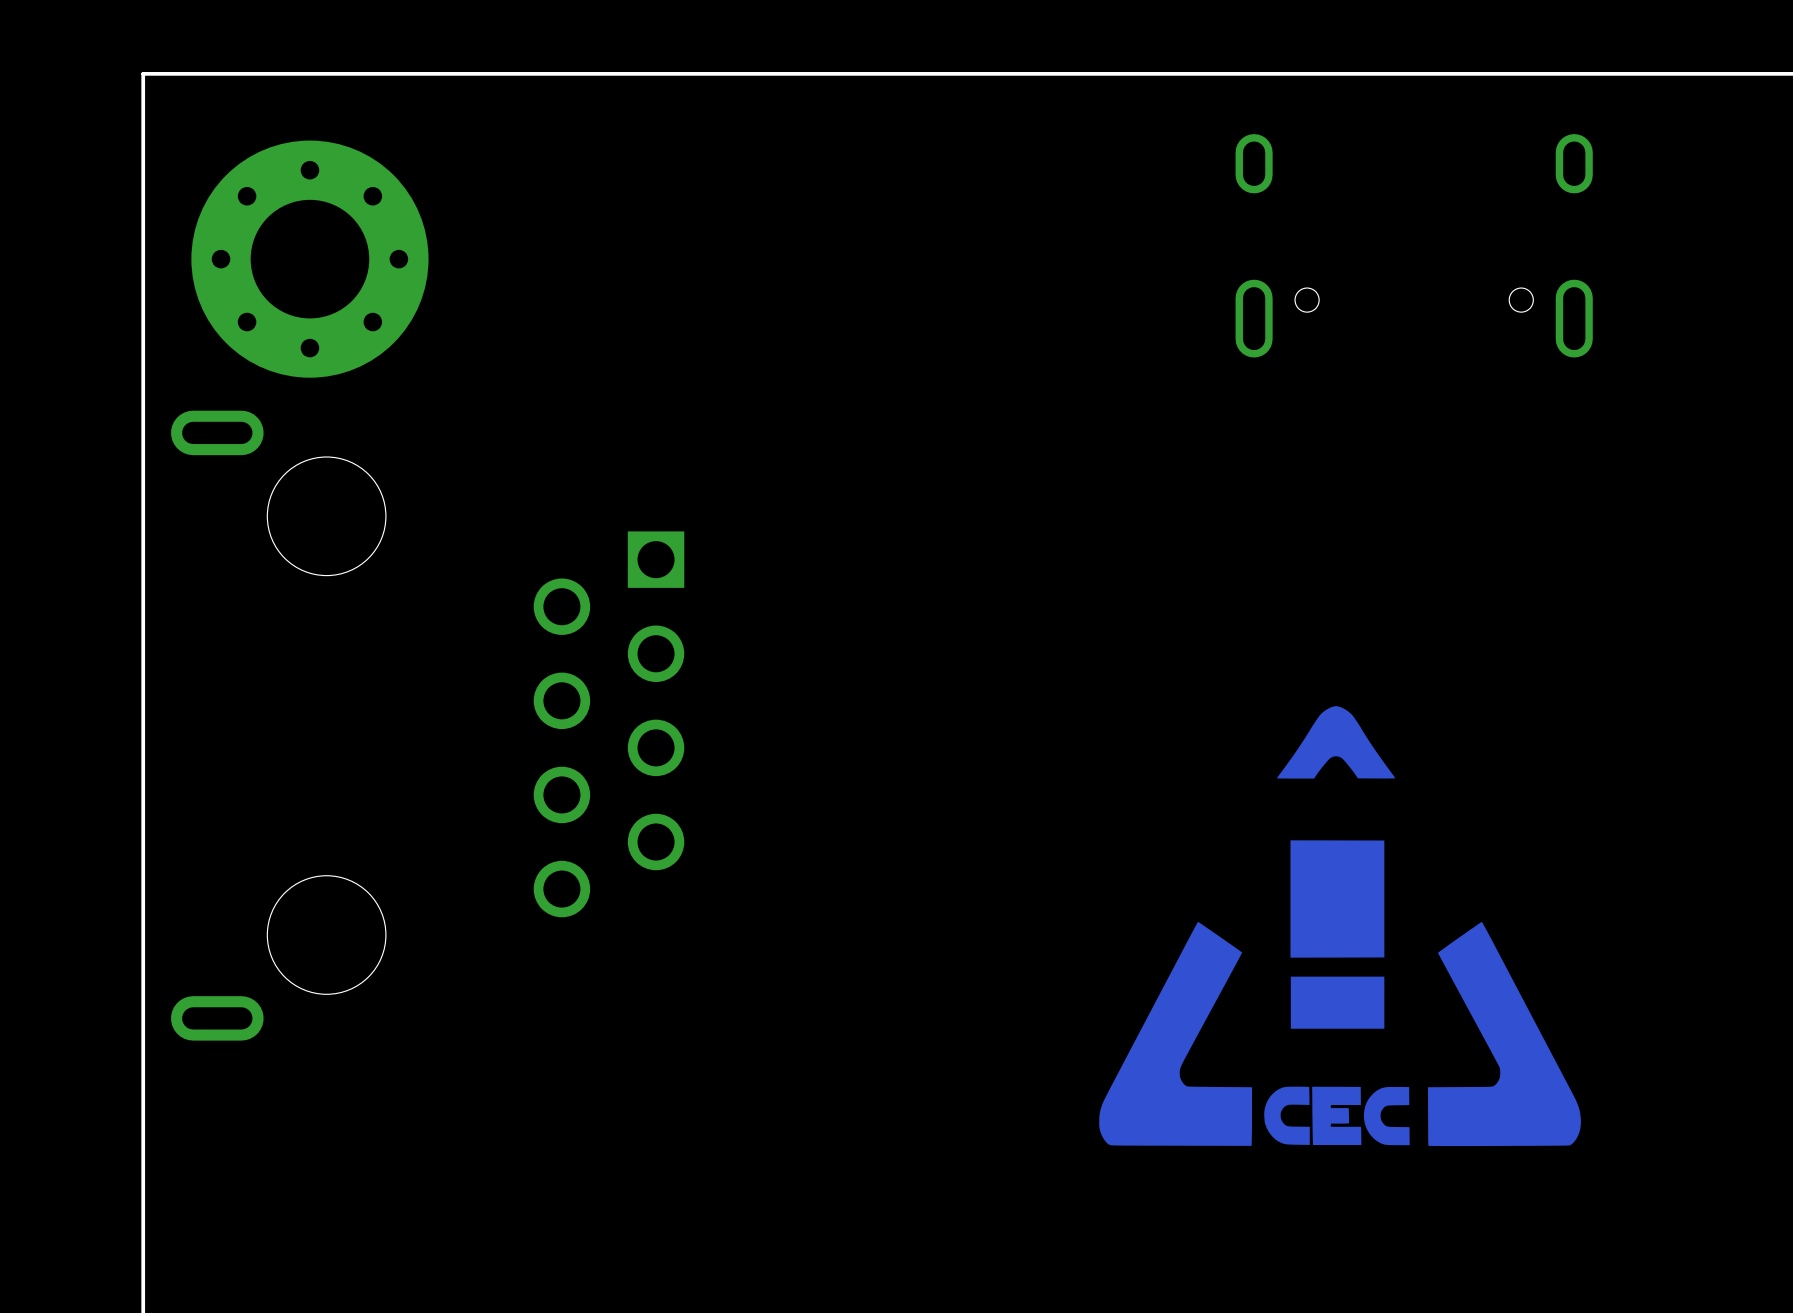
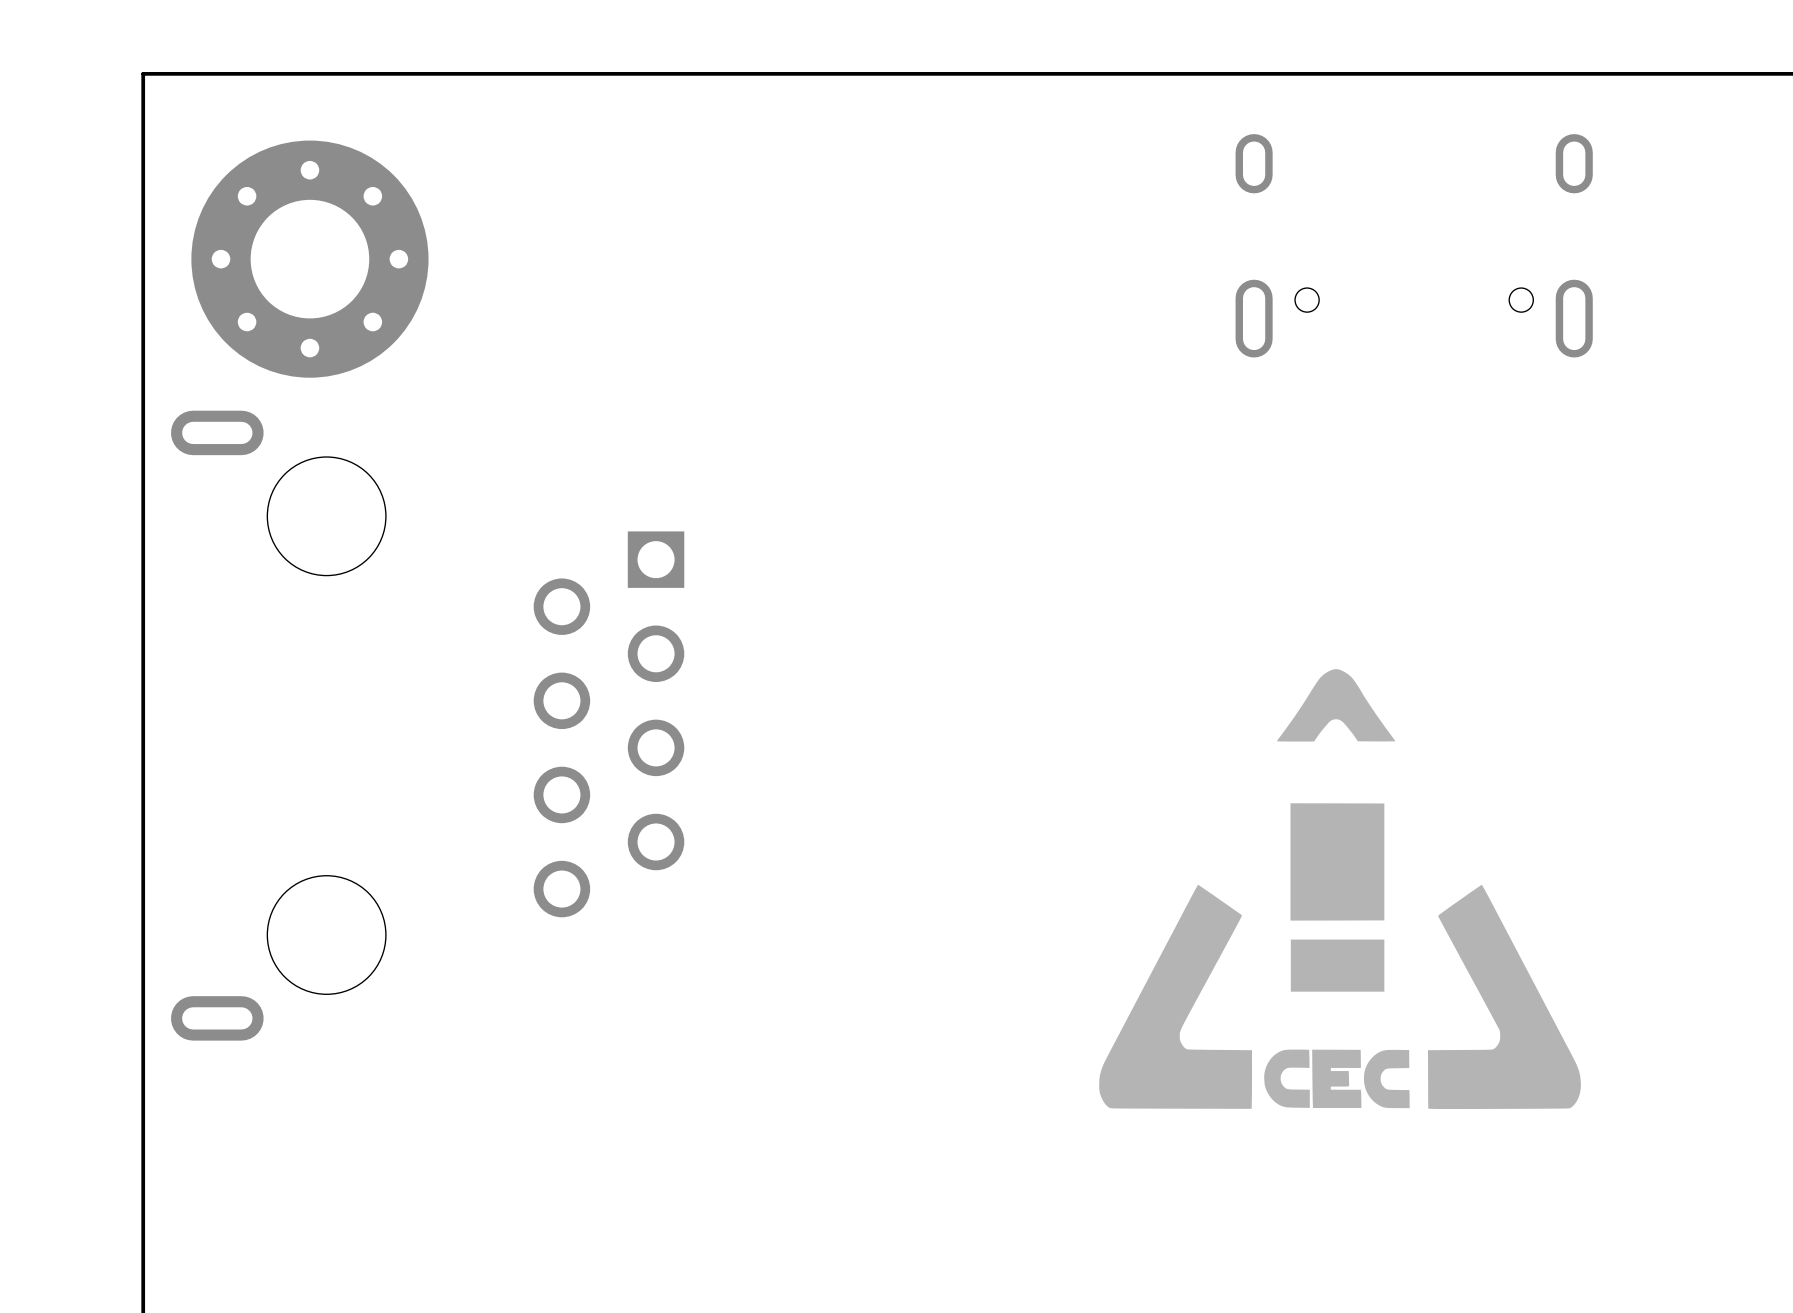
drawing position: (1340, 926) -> (1340, 889)

